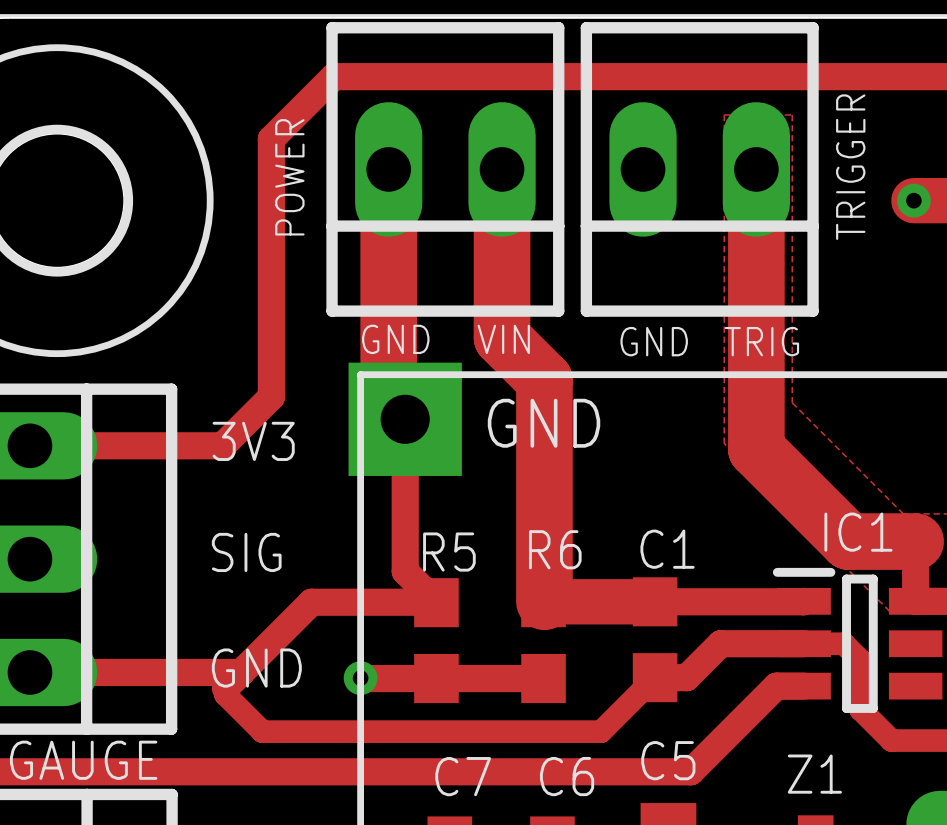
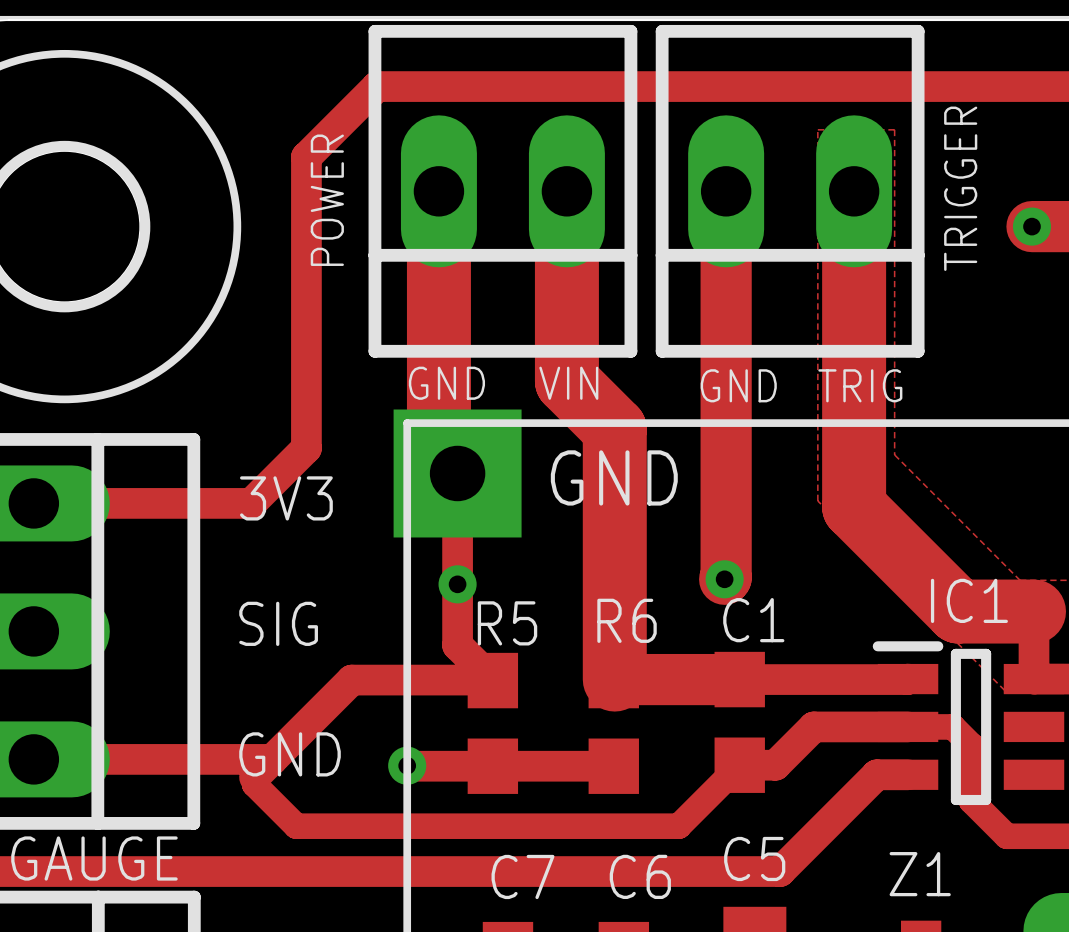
track: none -> (726, 191) (726, 577) (724, 579)
via: none -> (724, 579)
via: none -> (457, 584)

